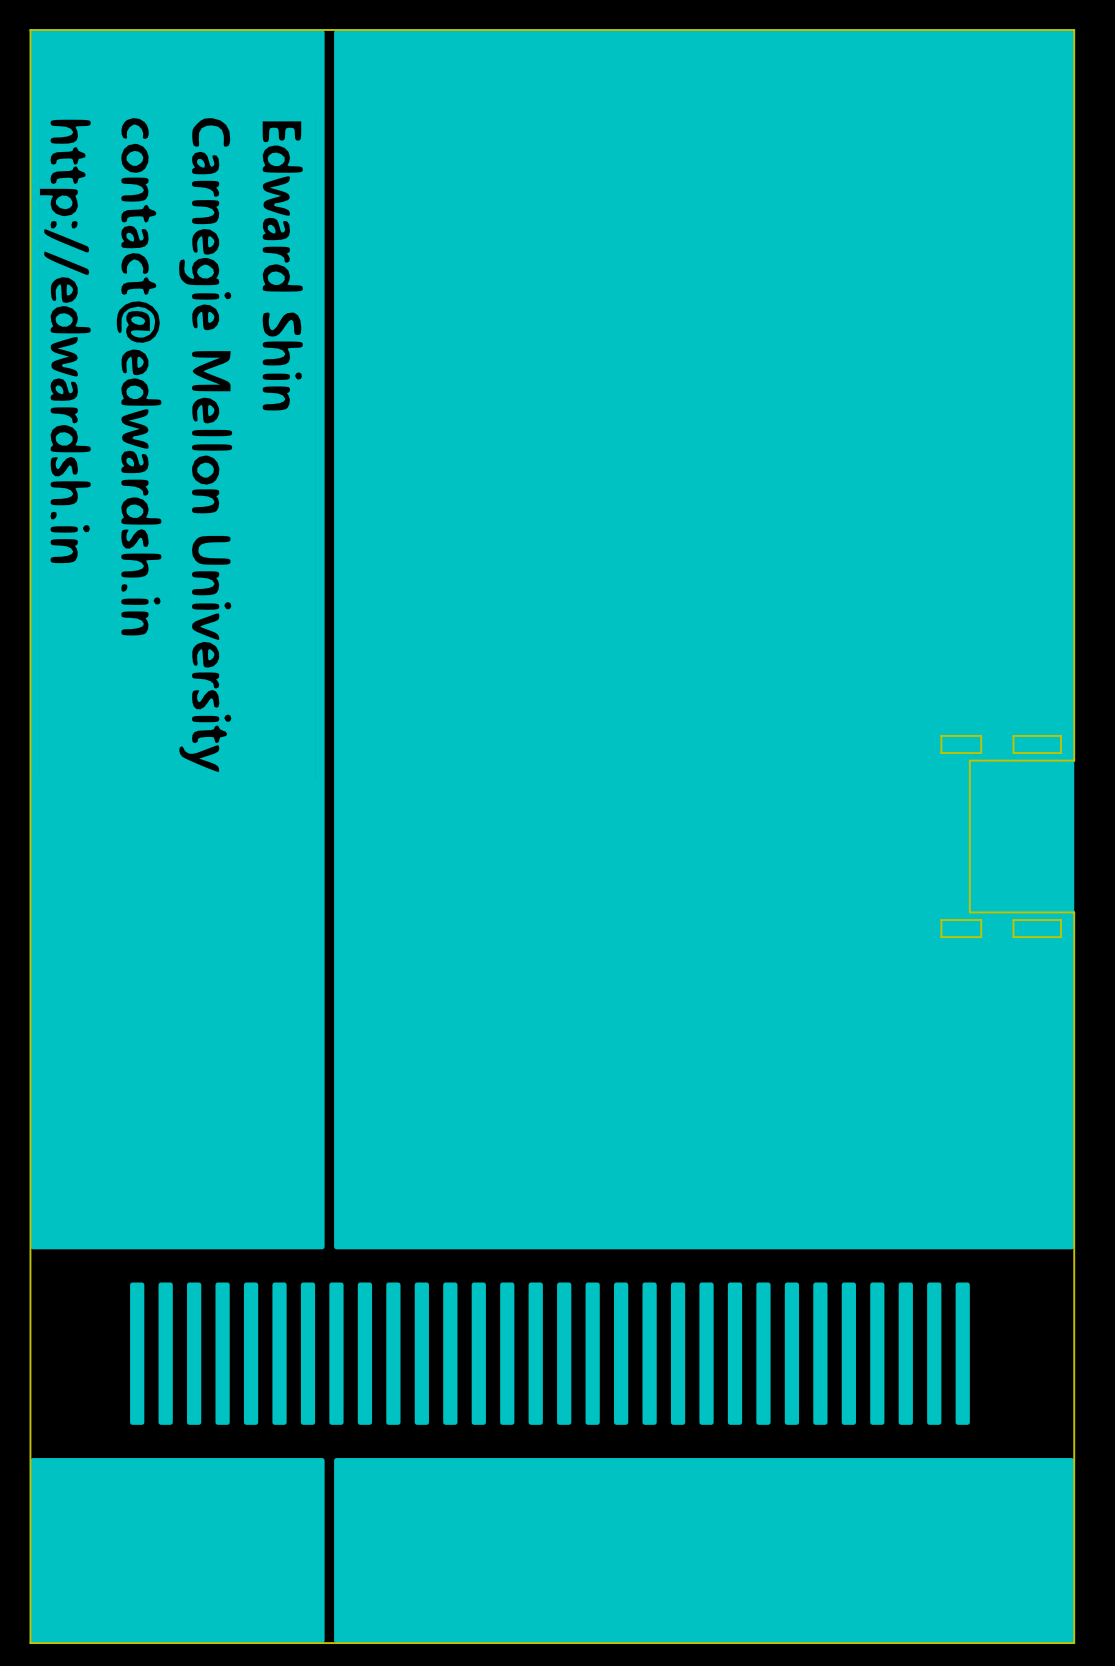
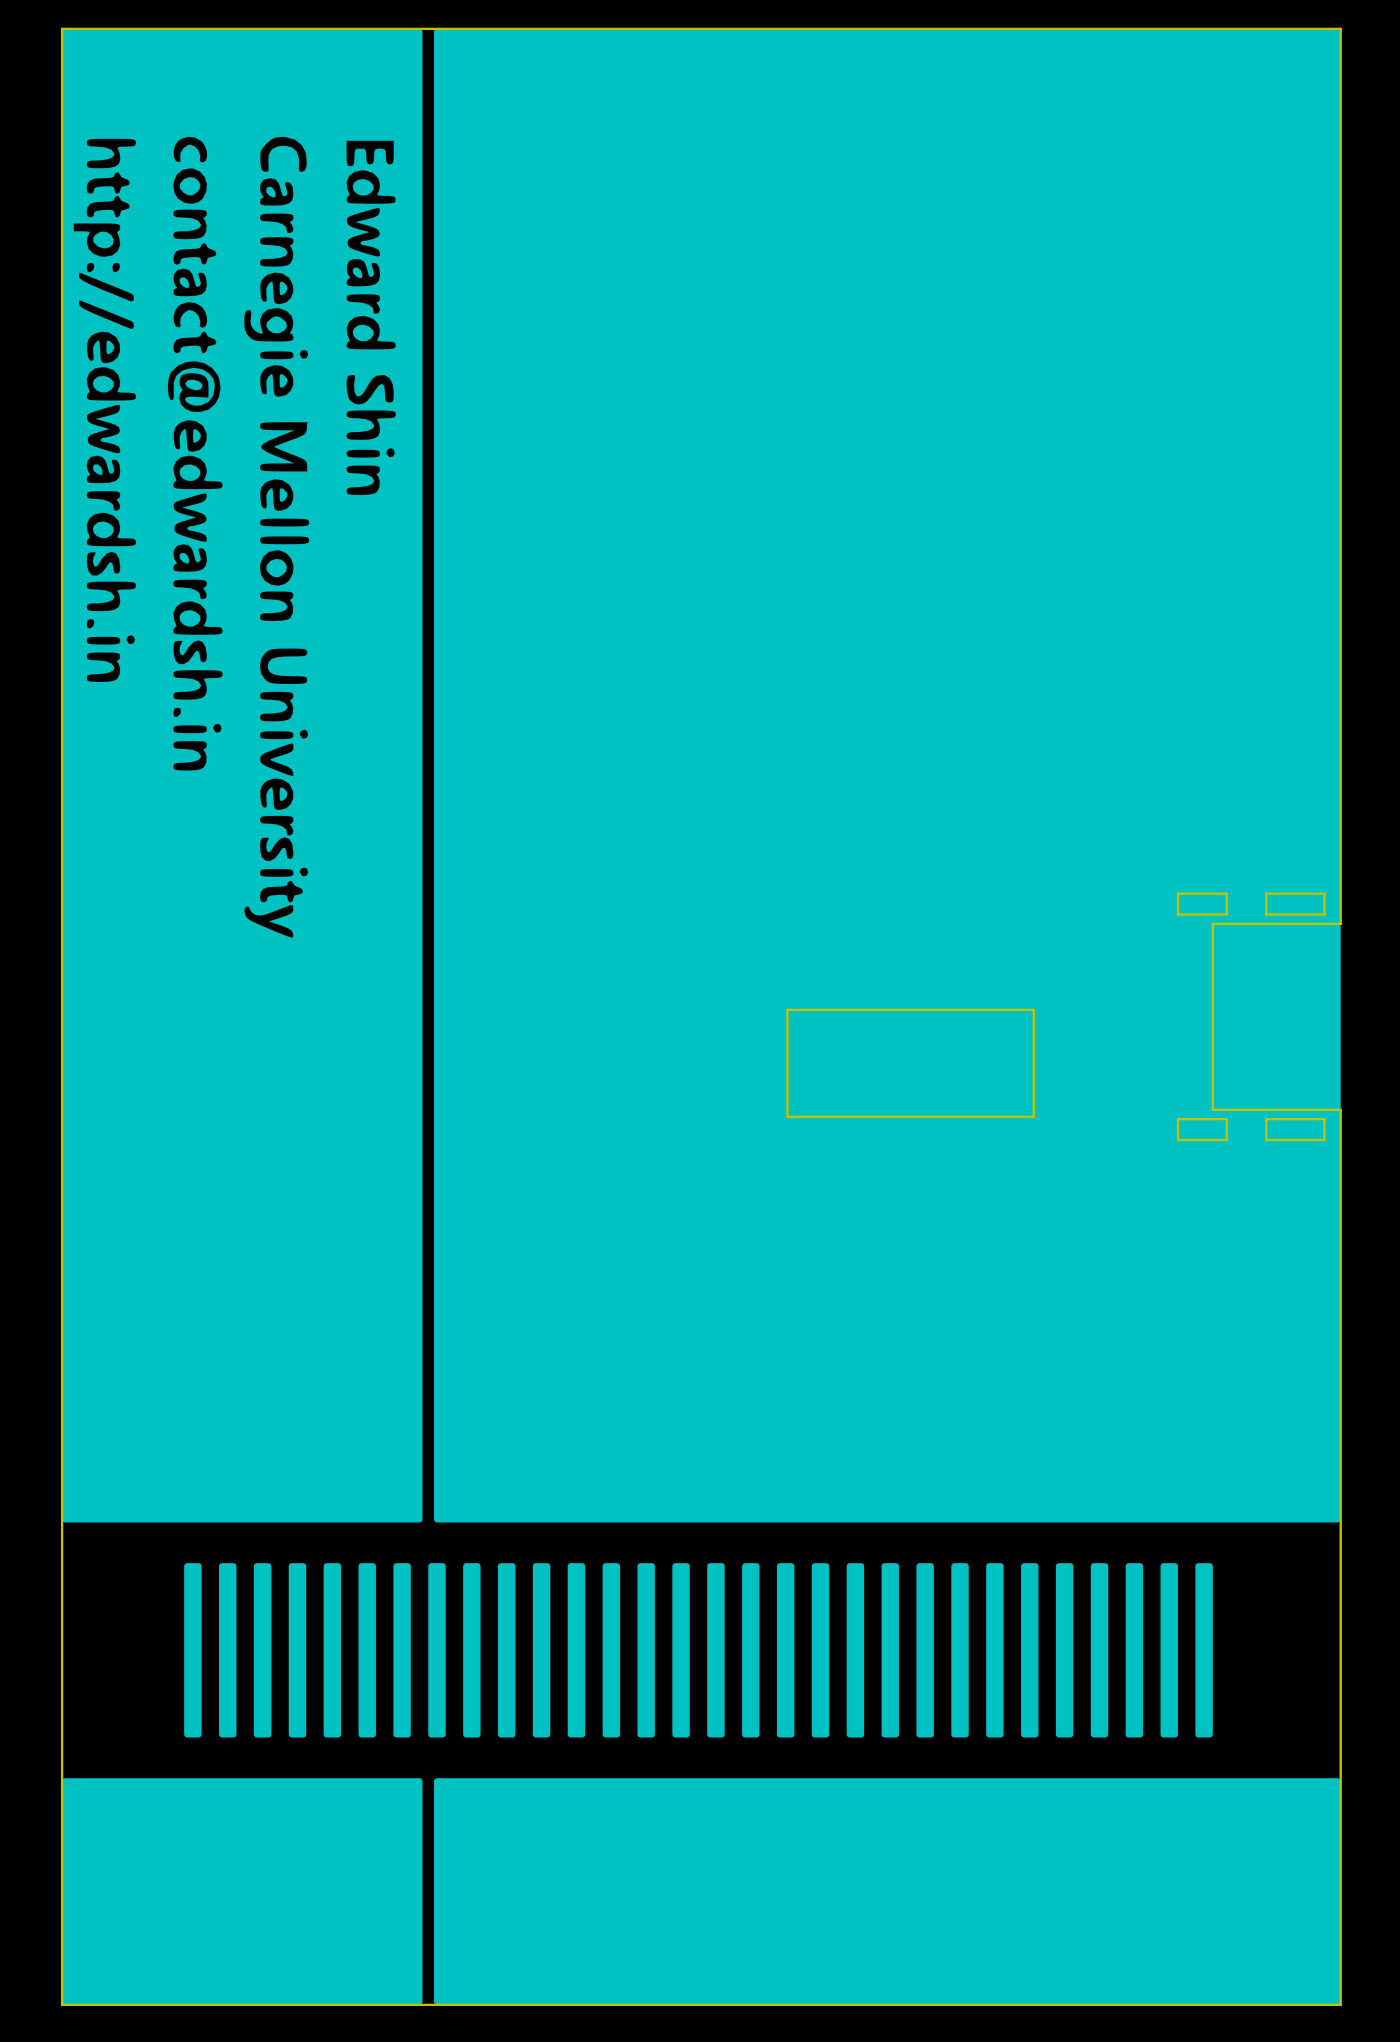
board edge: none -> (787, 1009) (787, 1116) (1033, 1116) (1033, 1009) (787, 1009)

